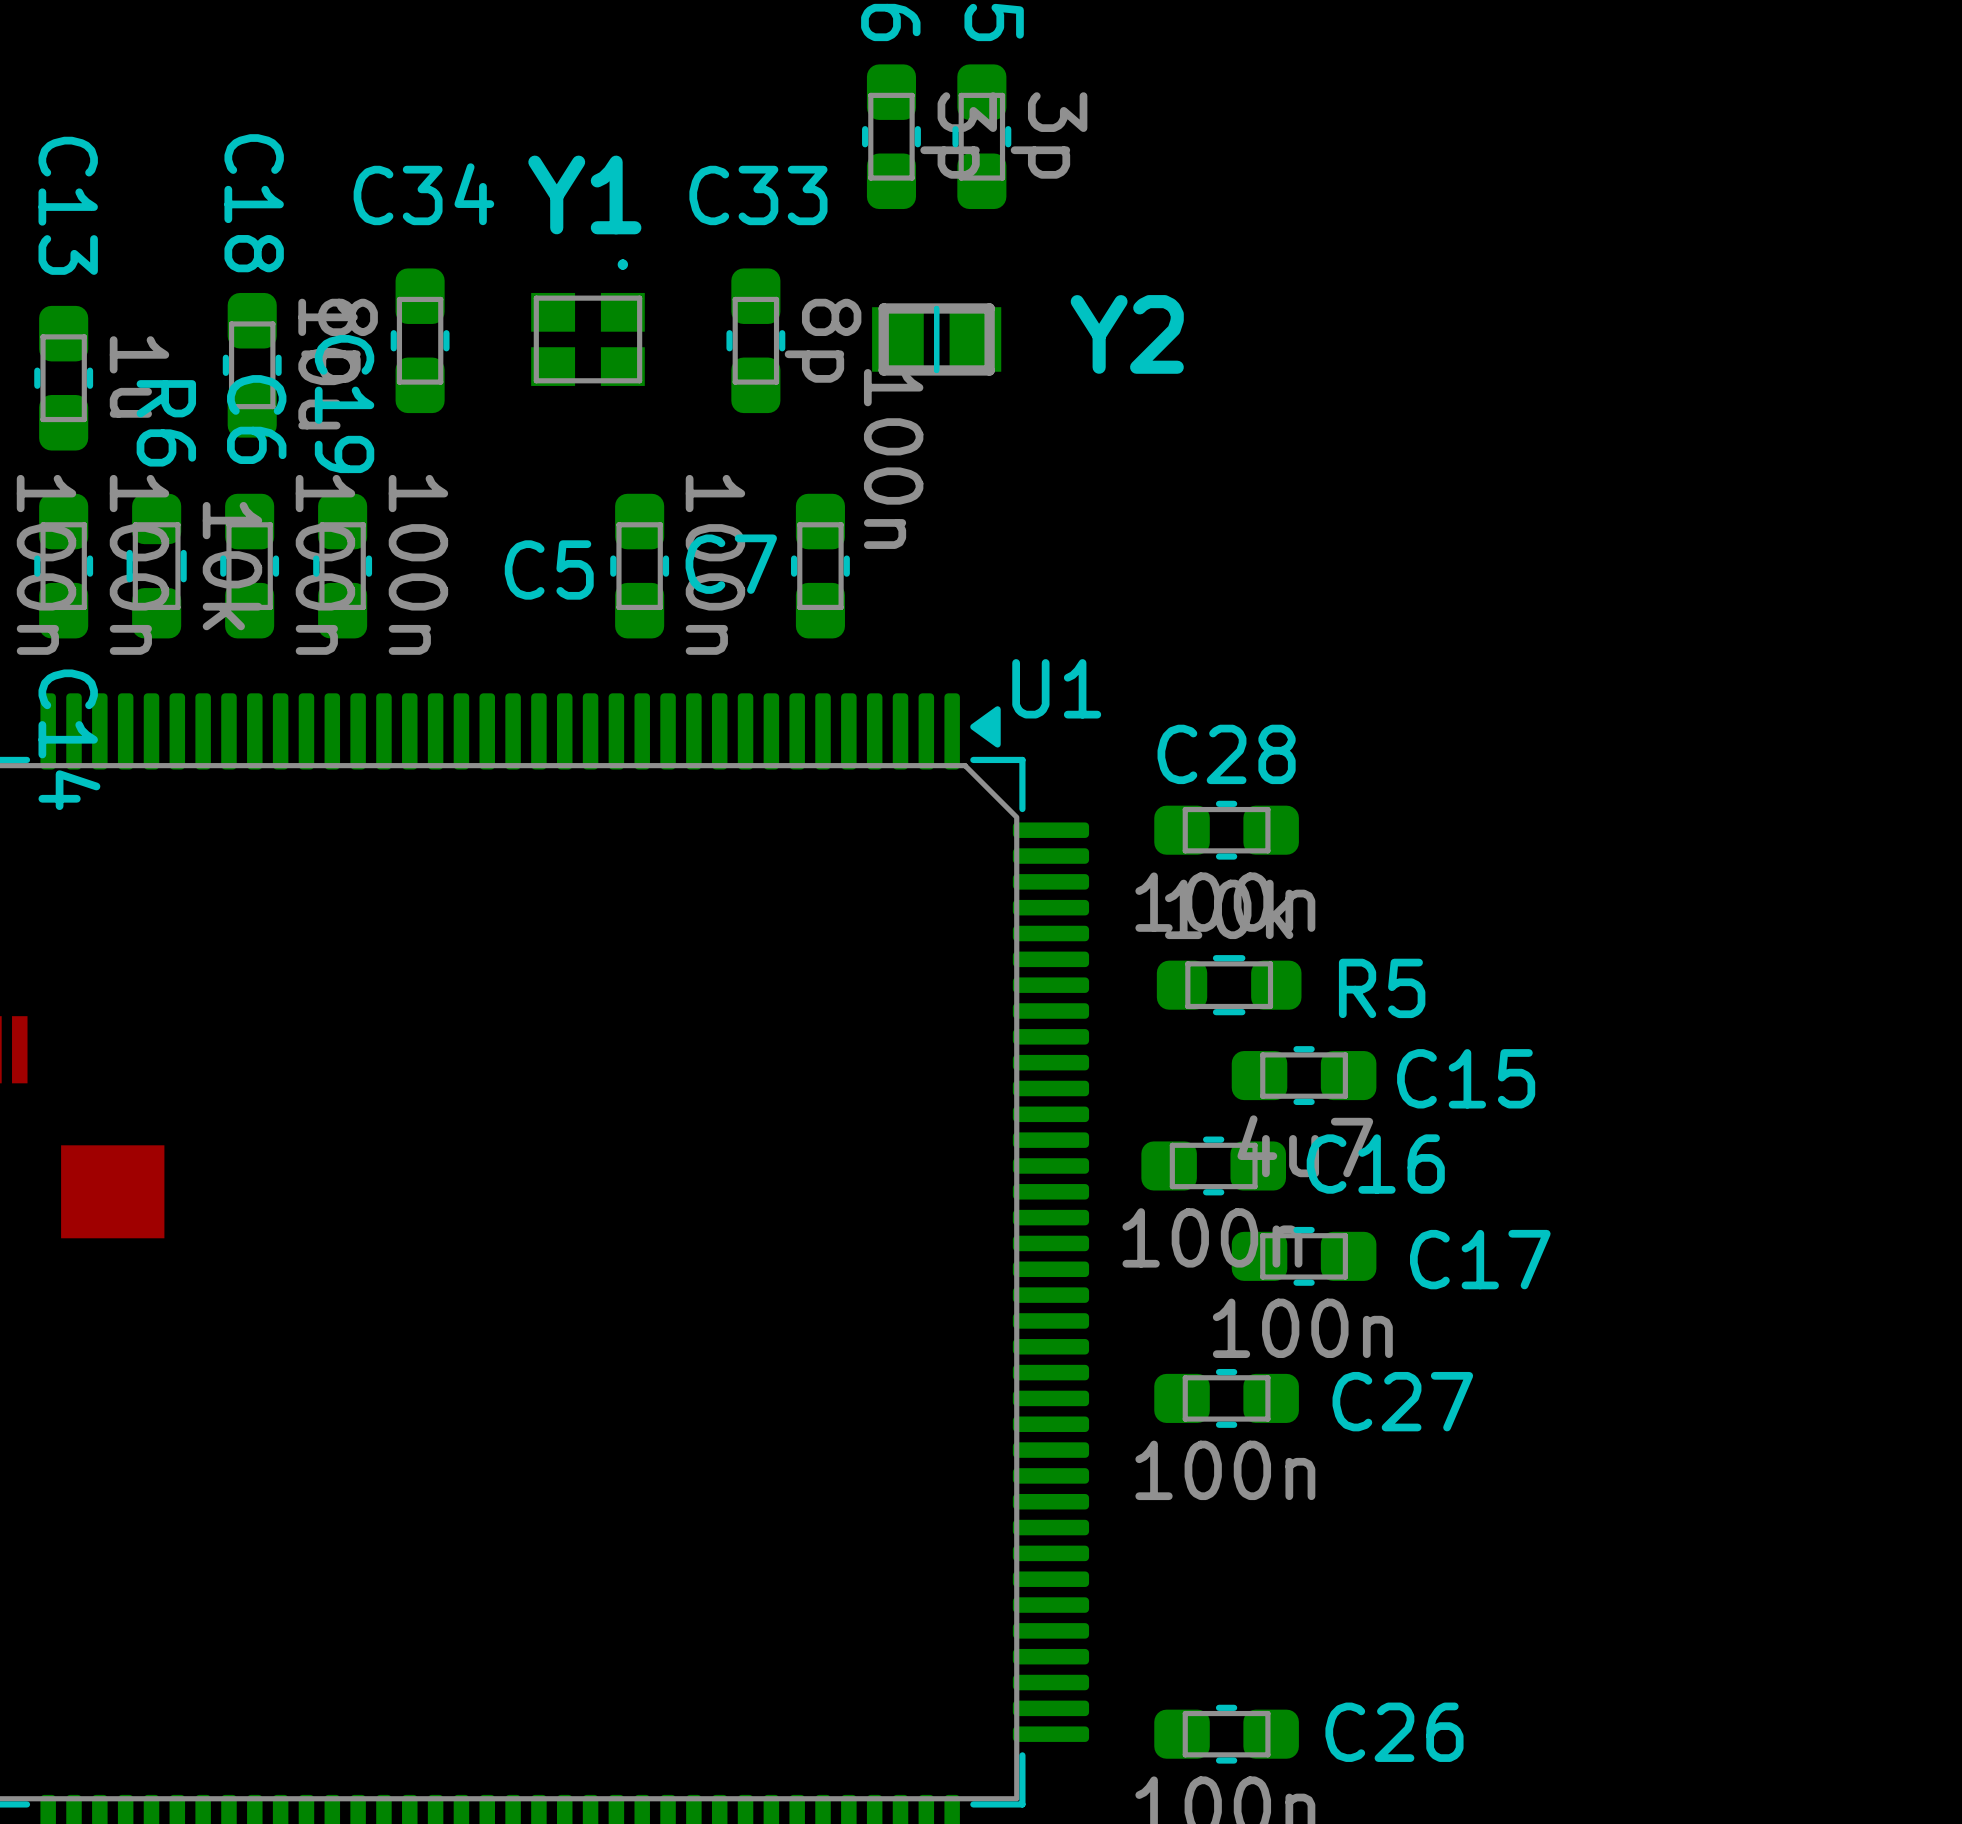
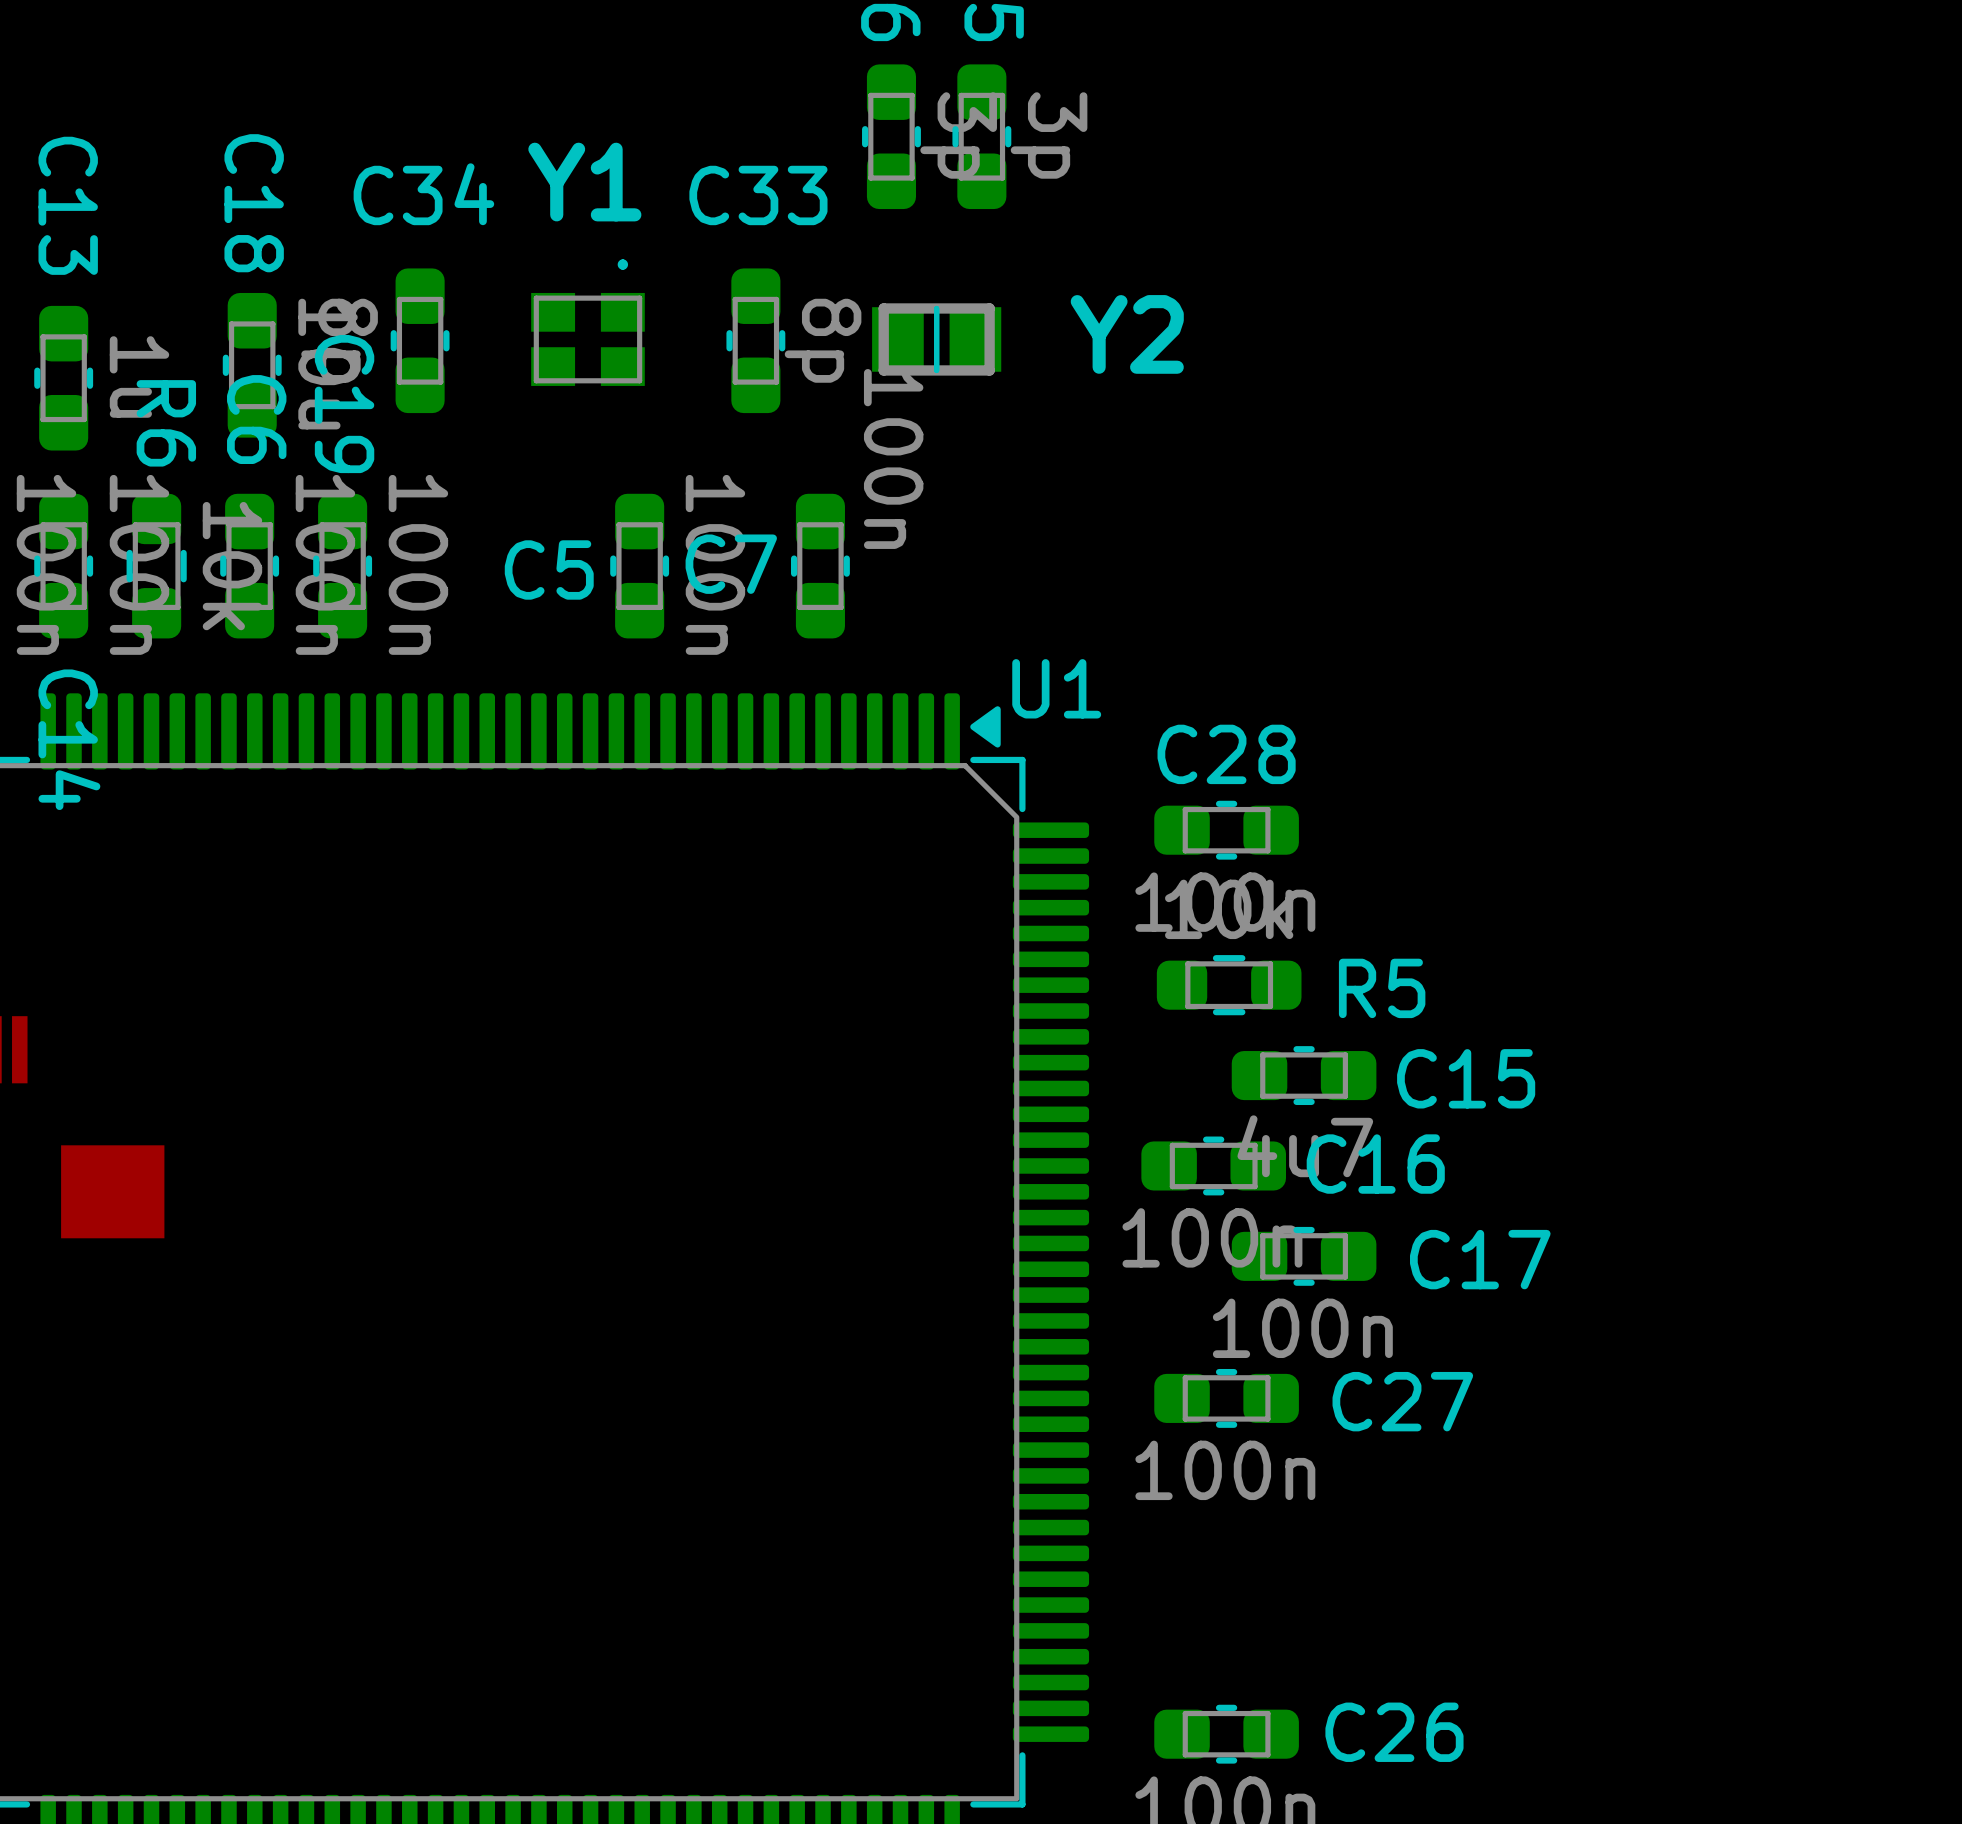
Y1 name position: Y1 (584, 194) -> Y1 (584, 182)

